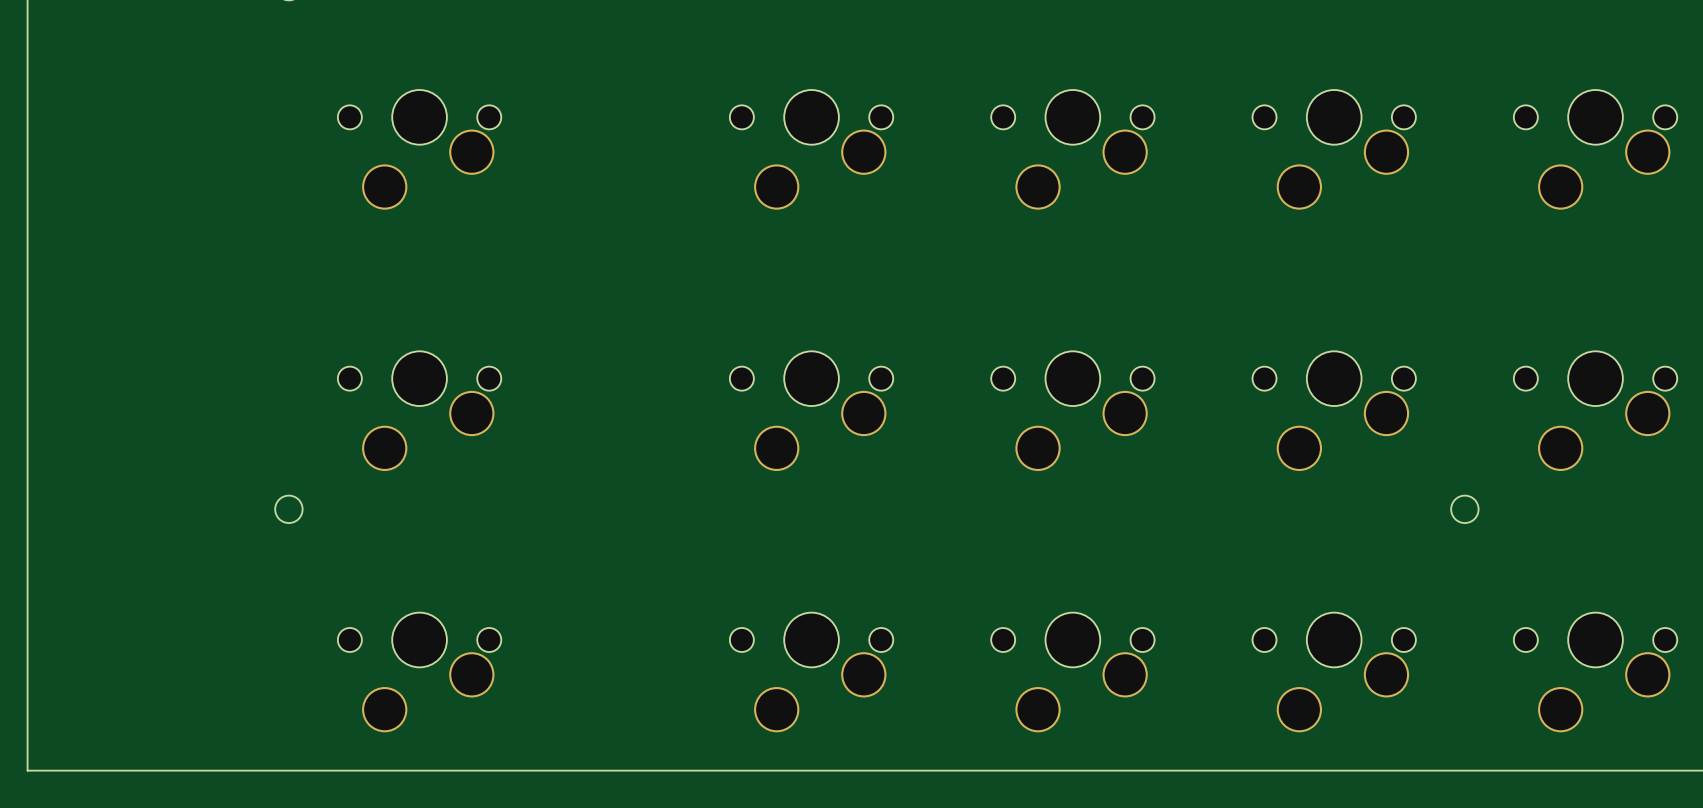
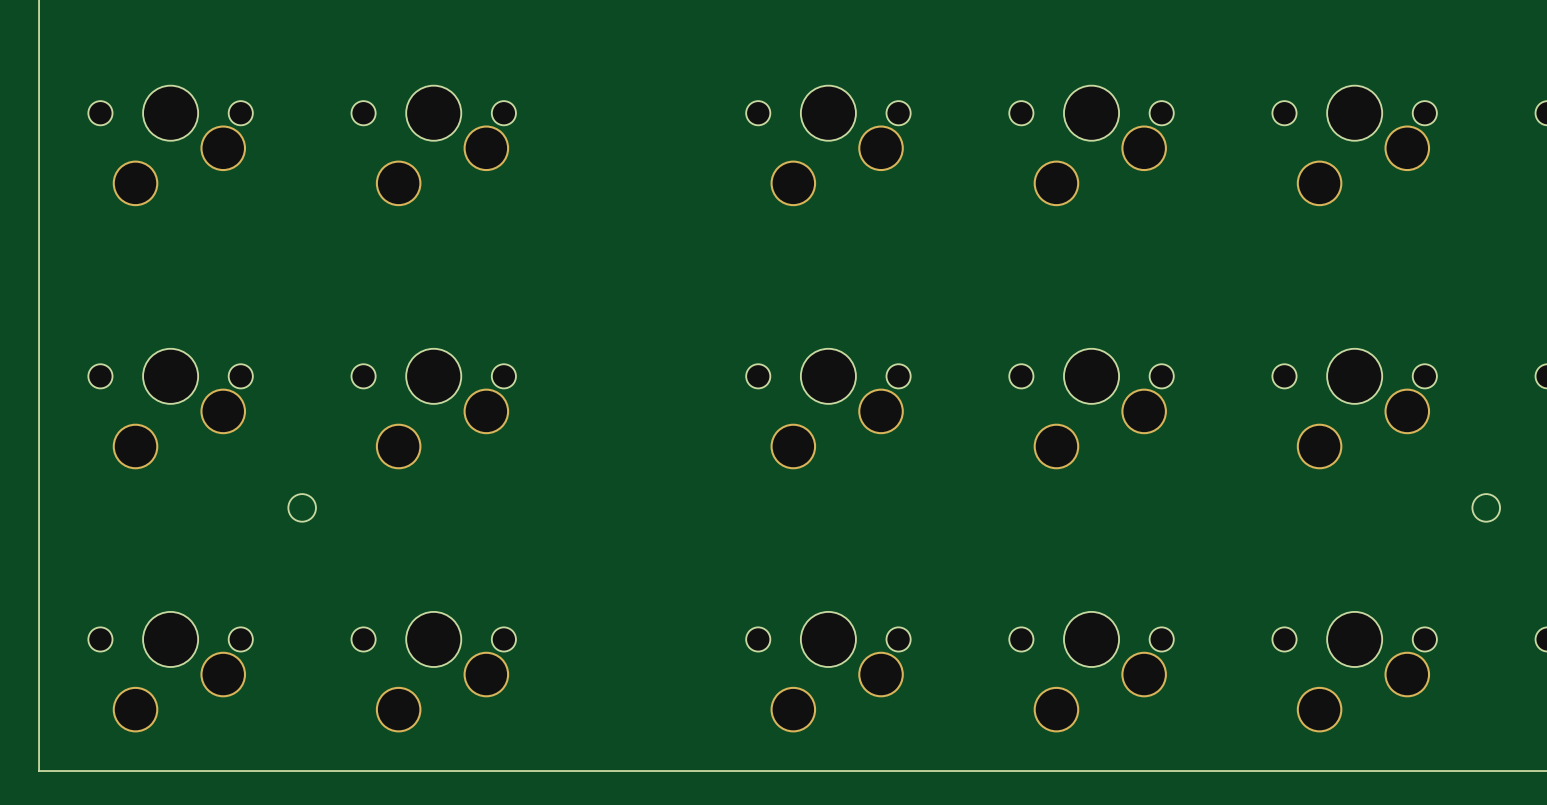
part: none -> (170, 145)
part: none -> (170, 409)
part: none -> (170, 672)

